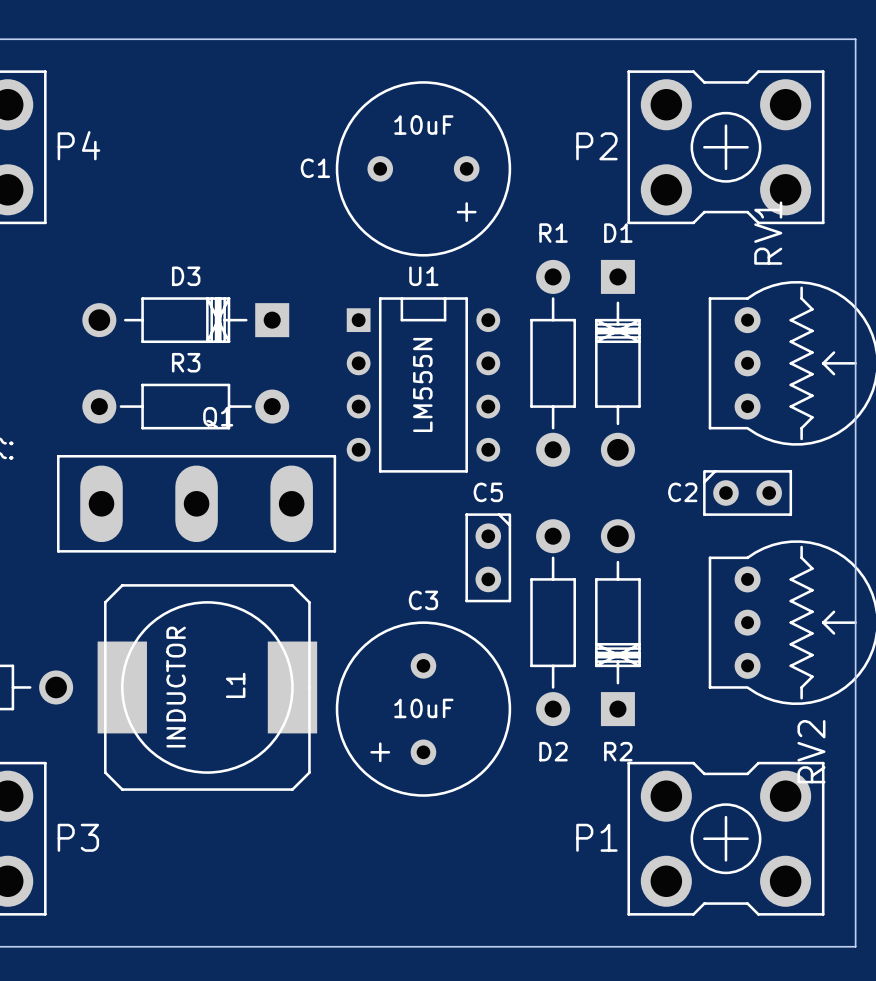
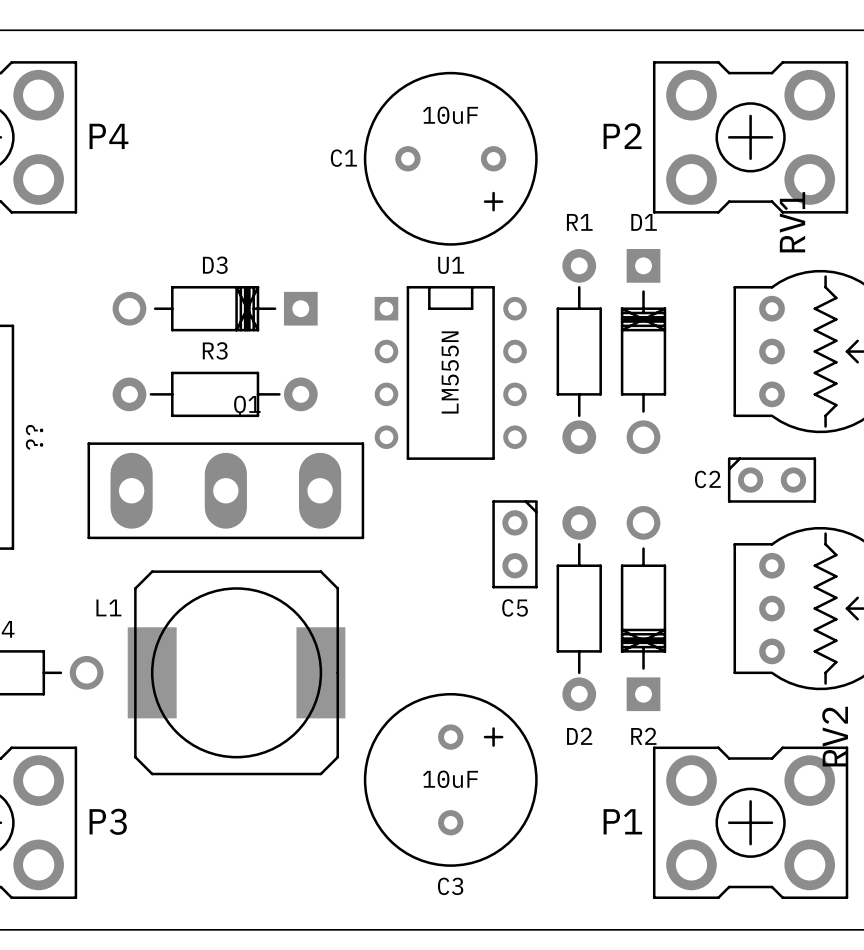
C5 name position: C5 (488, 492) -> C5 (515, 607)
L1 name rotation: 0° (235, 685) -> 90° clockwise (108, 607)
L1 name position: L1 (235, 685) -> L1 (108, 607)
L1 value: INDUCTOR (176, 687) -> none
C3 rotation: 0° (423, 709) -> 180° (450, 779)

